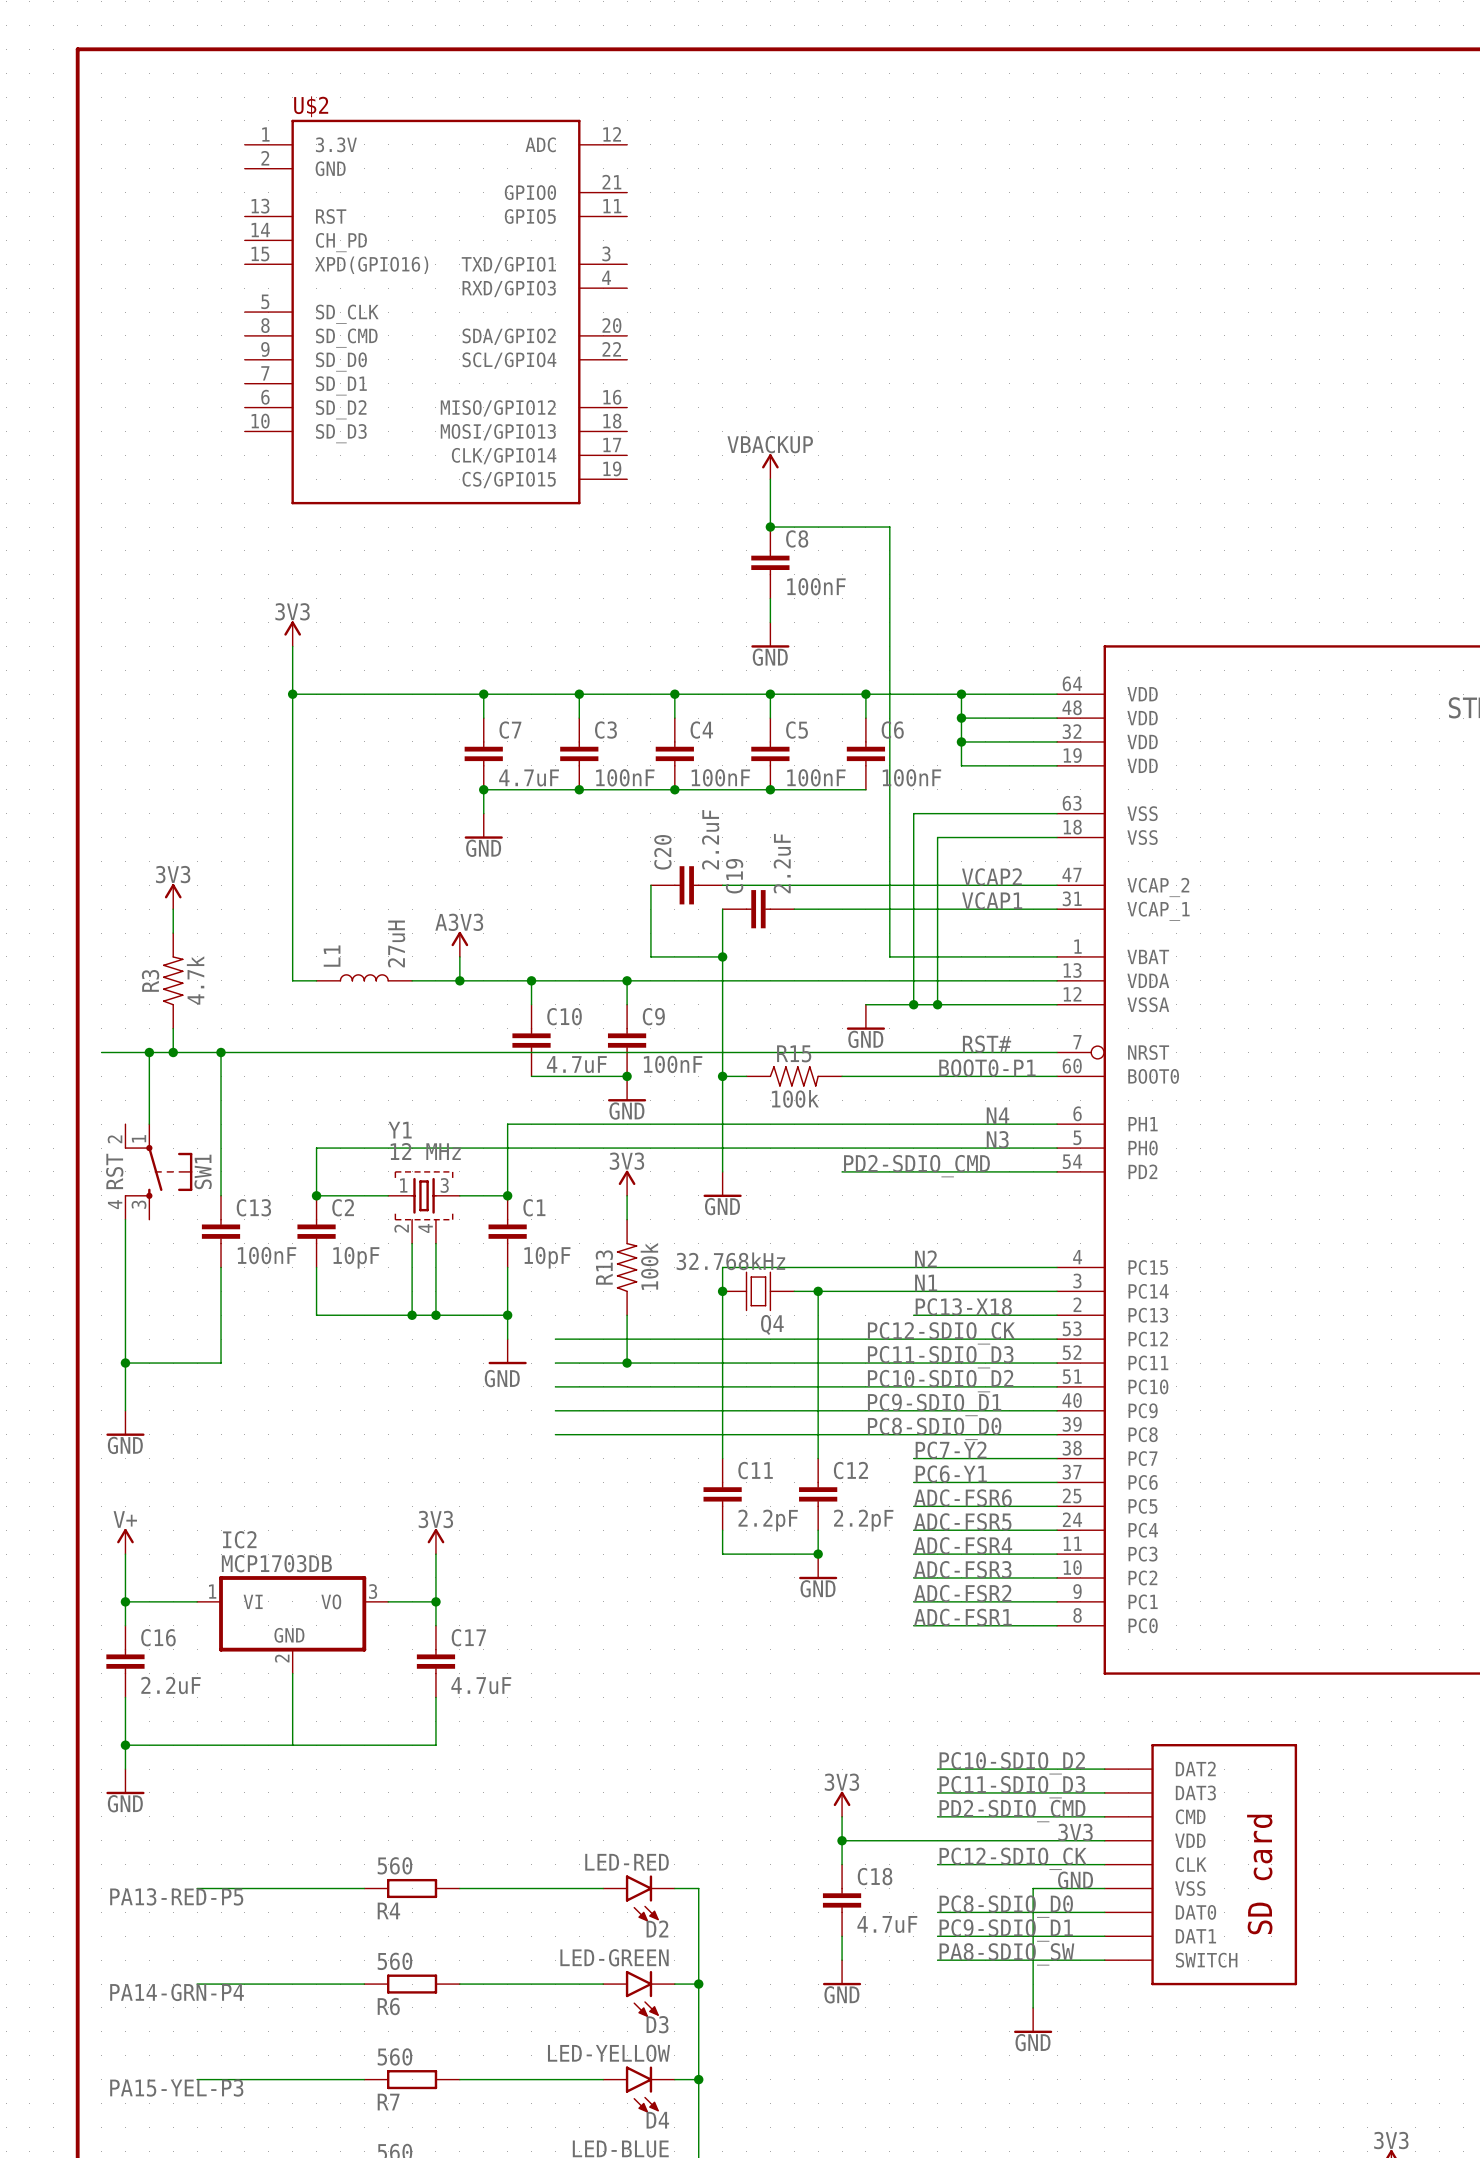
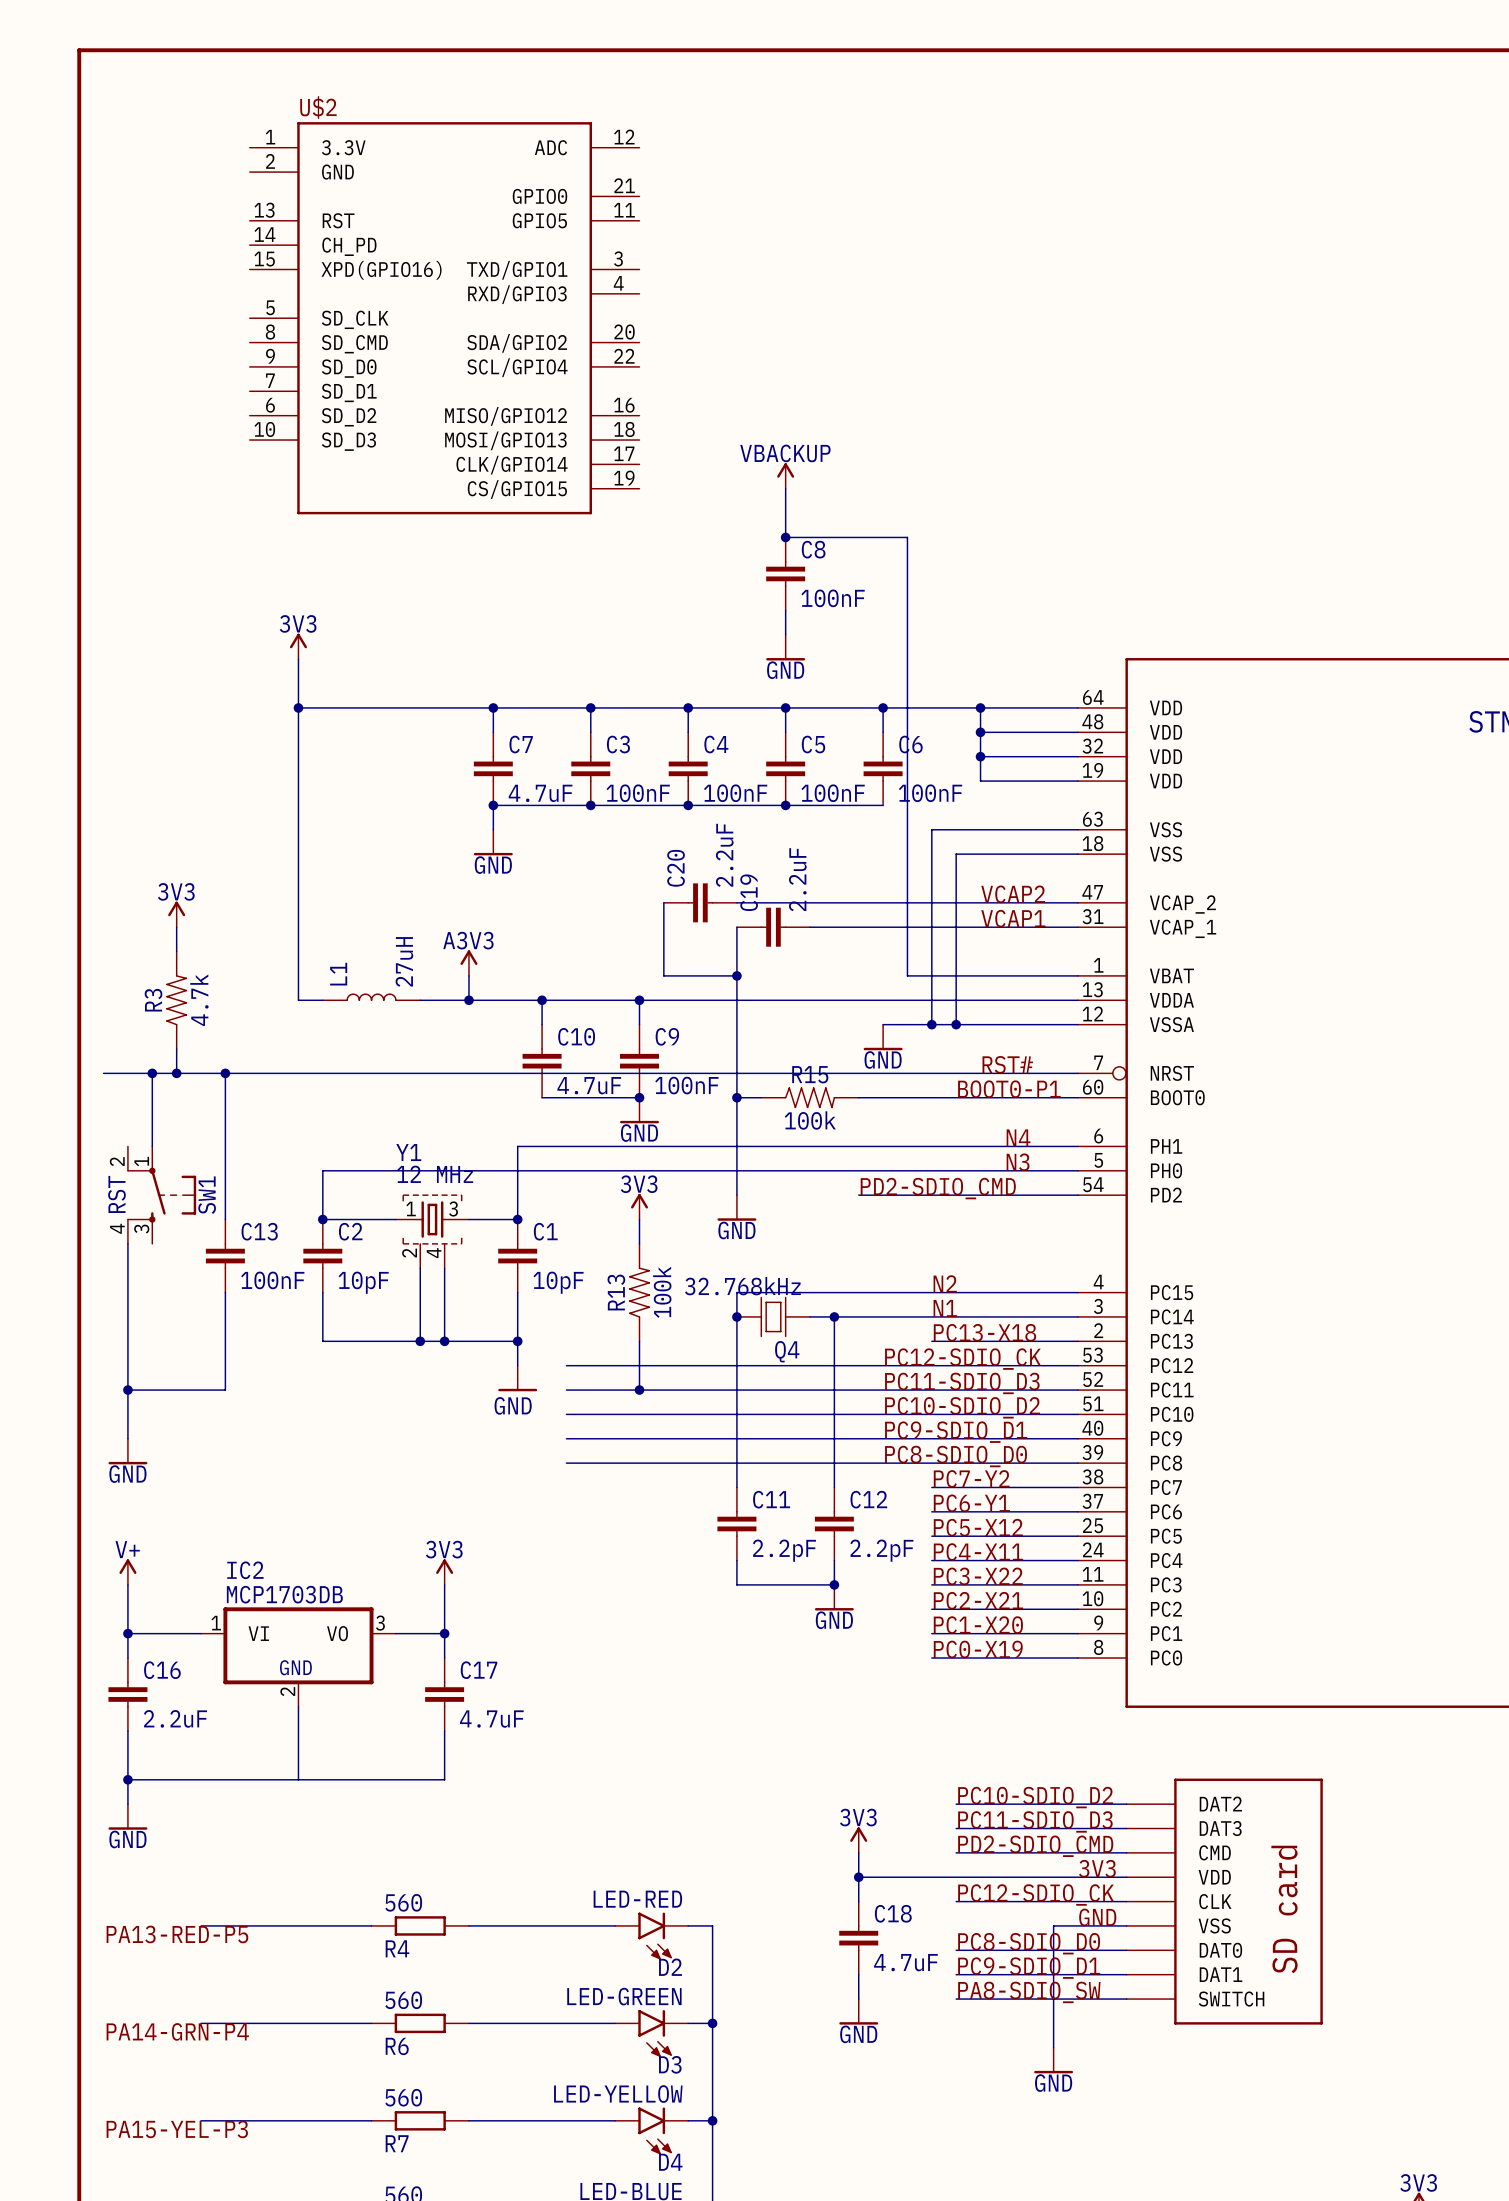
label: ADC-FSR6 (962, 1497) -> PC5-X12 (978, 1527)
label: ADC-FSR5 (962, 1521) -> PC4-X11 (978, 1552)
label: ADC-FSR4 (963, 1545) -> PC3-X22 (978, 1576)
label: ADC-FSR3 (962, 1569) -> PC2-X21 (978, 1600)
label: ADC-FSR2 (962, 1593) -> PC1-X20 (978, 1625)
label: ADC-FSR1 (962, 1617) -> PC0-X19 (978, 1649)

